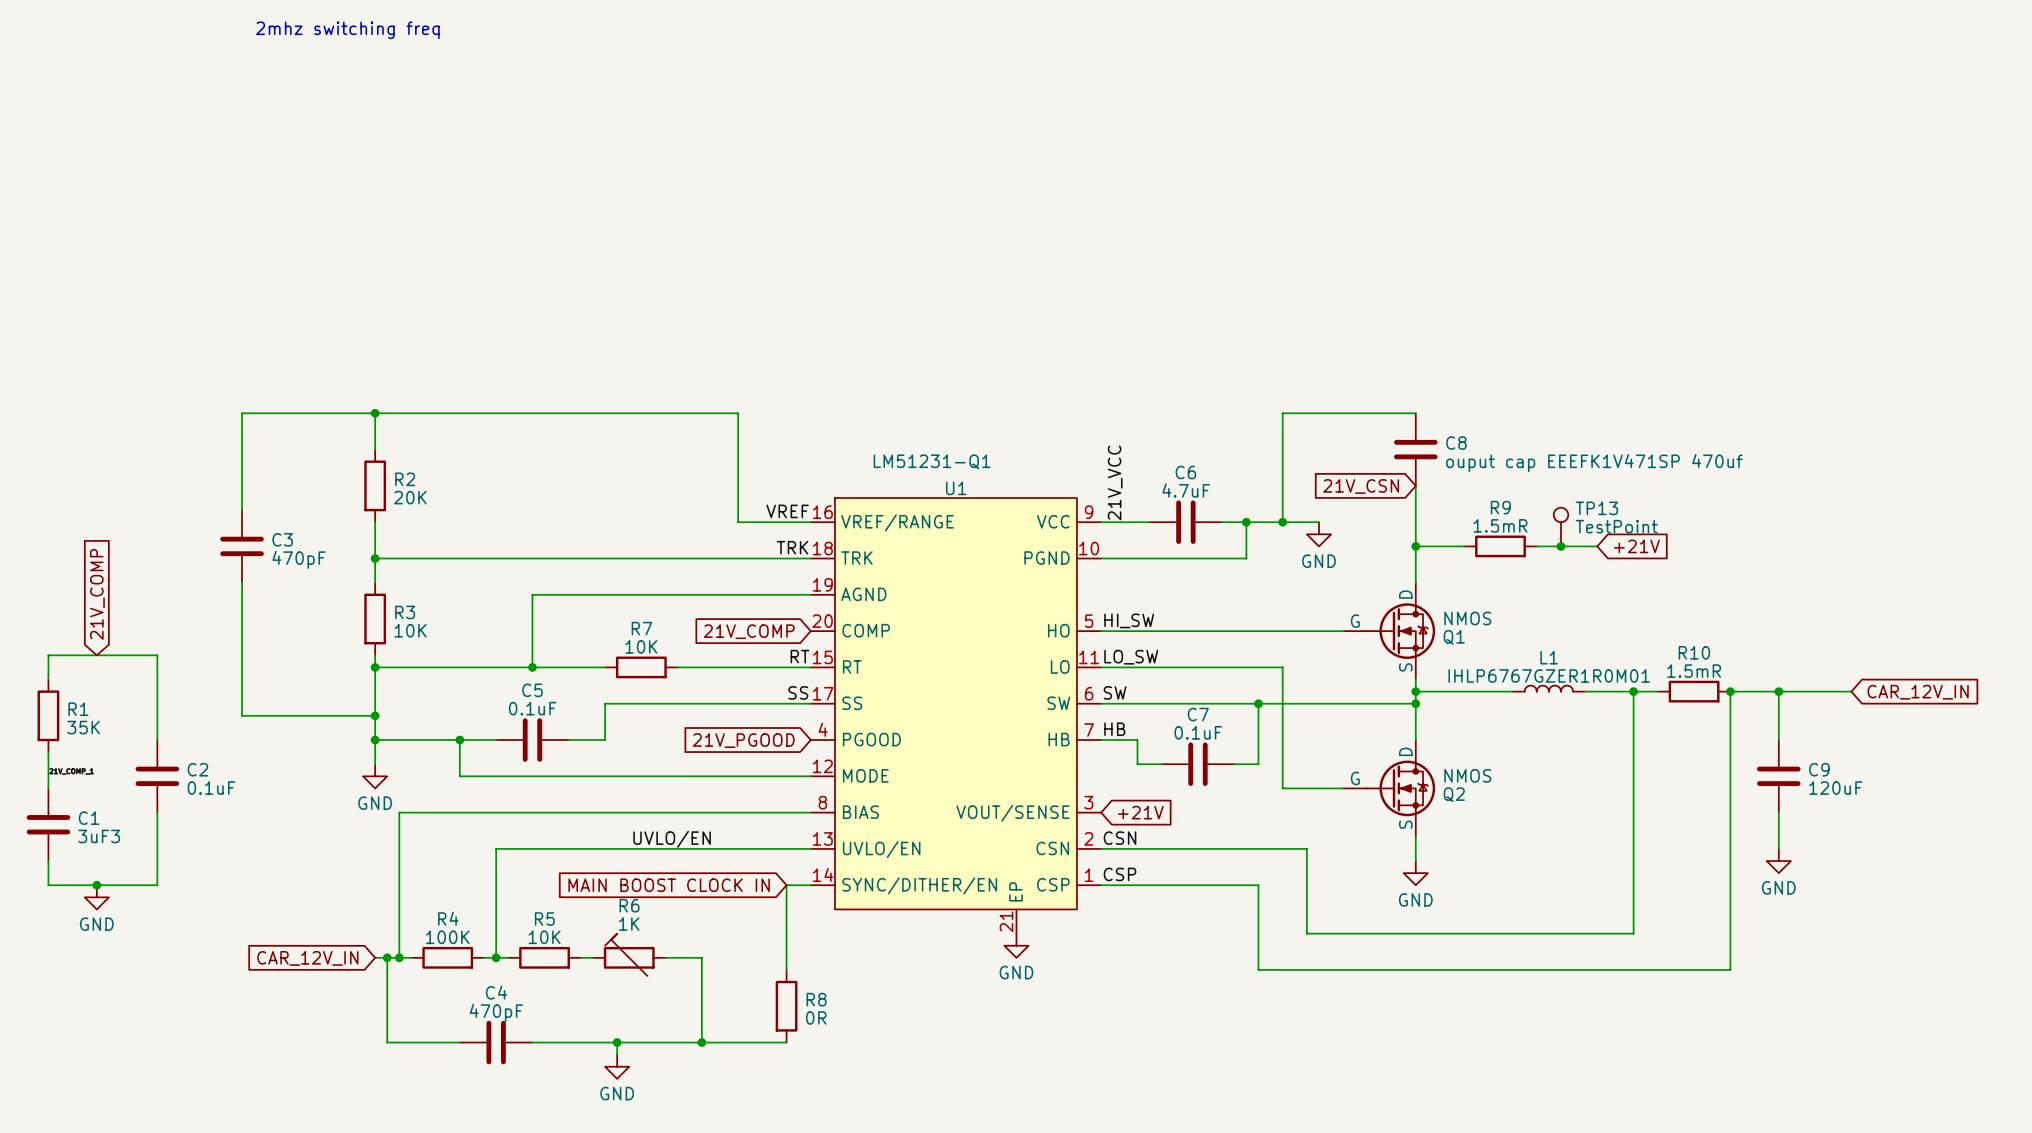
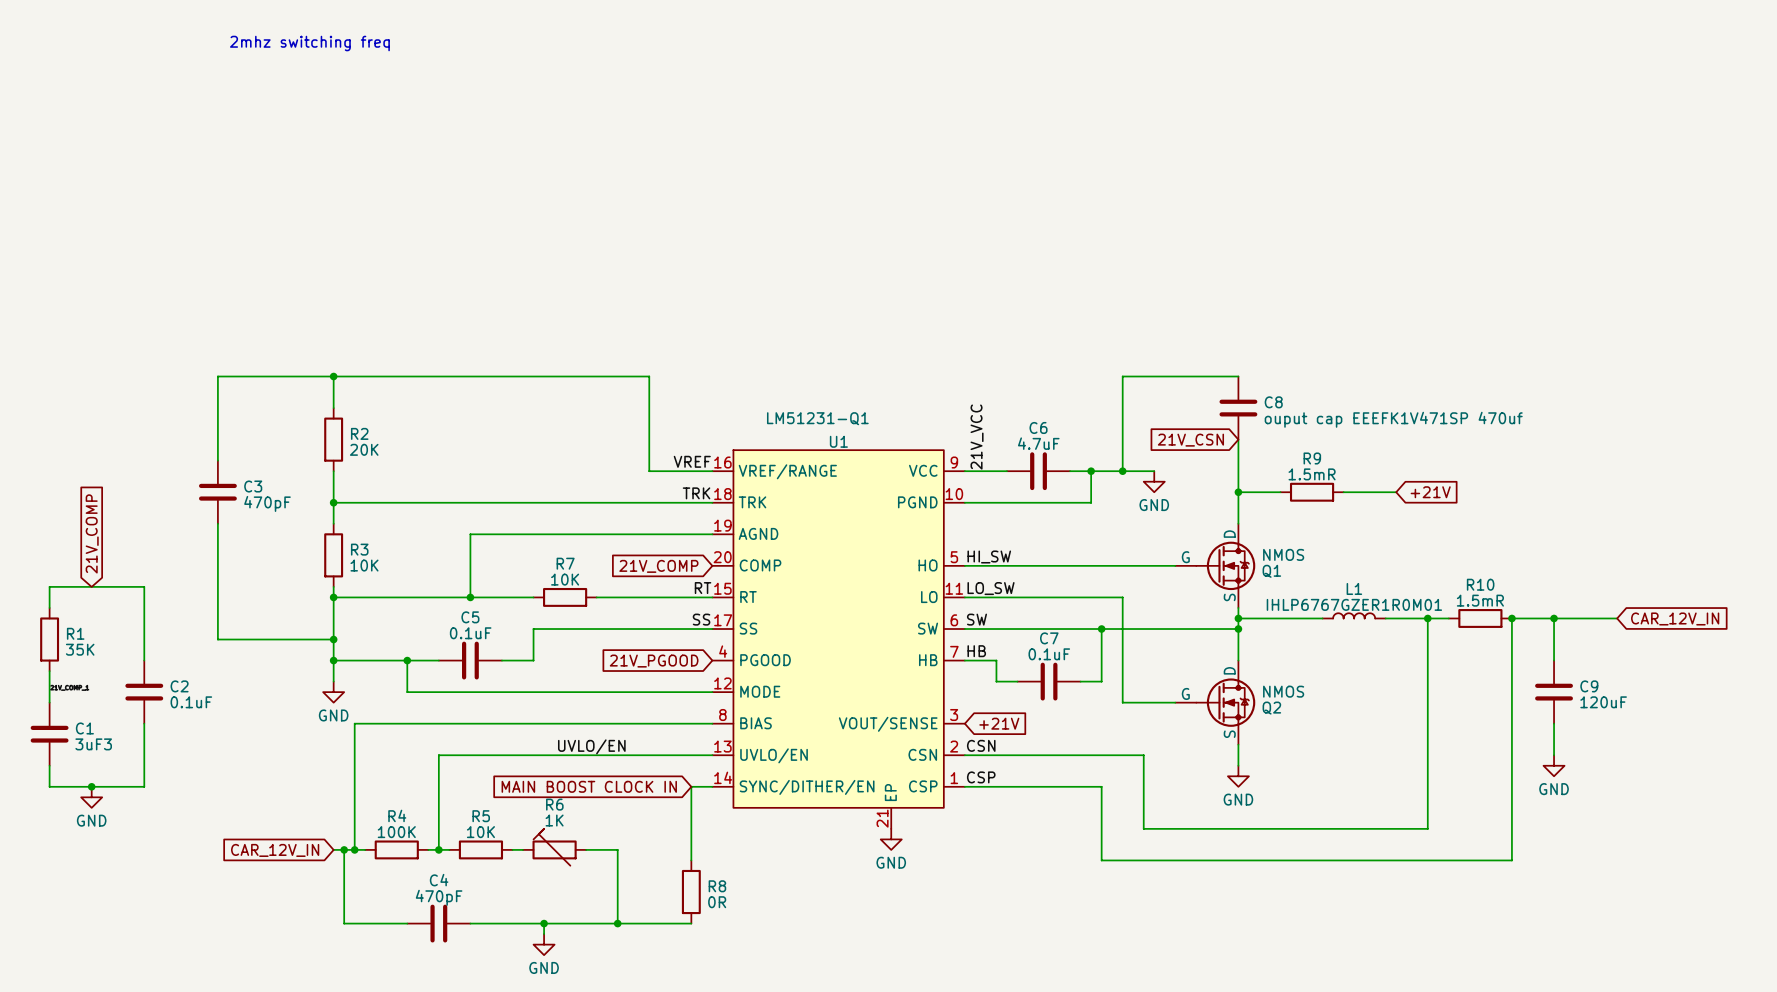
TP13: TestPoint (1561, 527) -> none
junction: (1561, 546) -> none

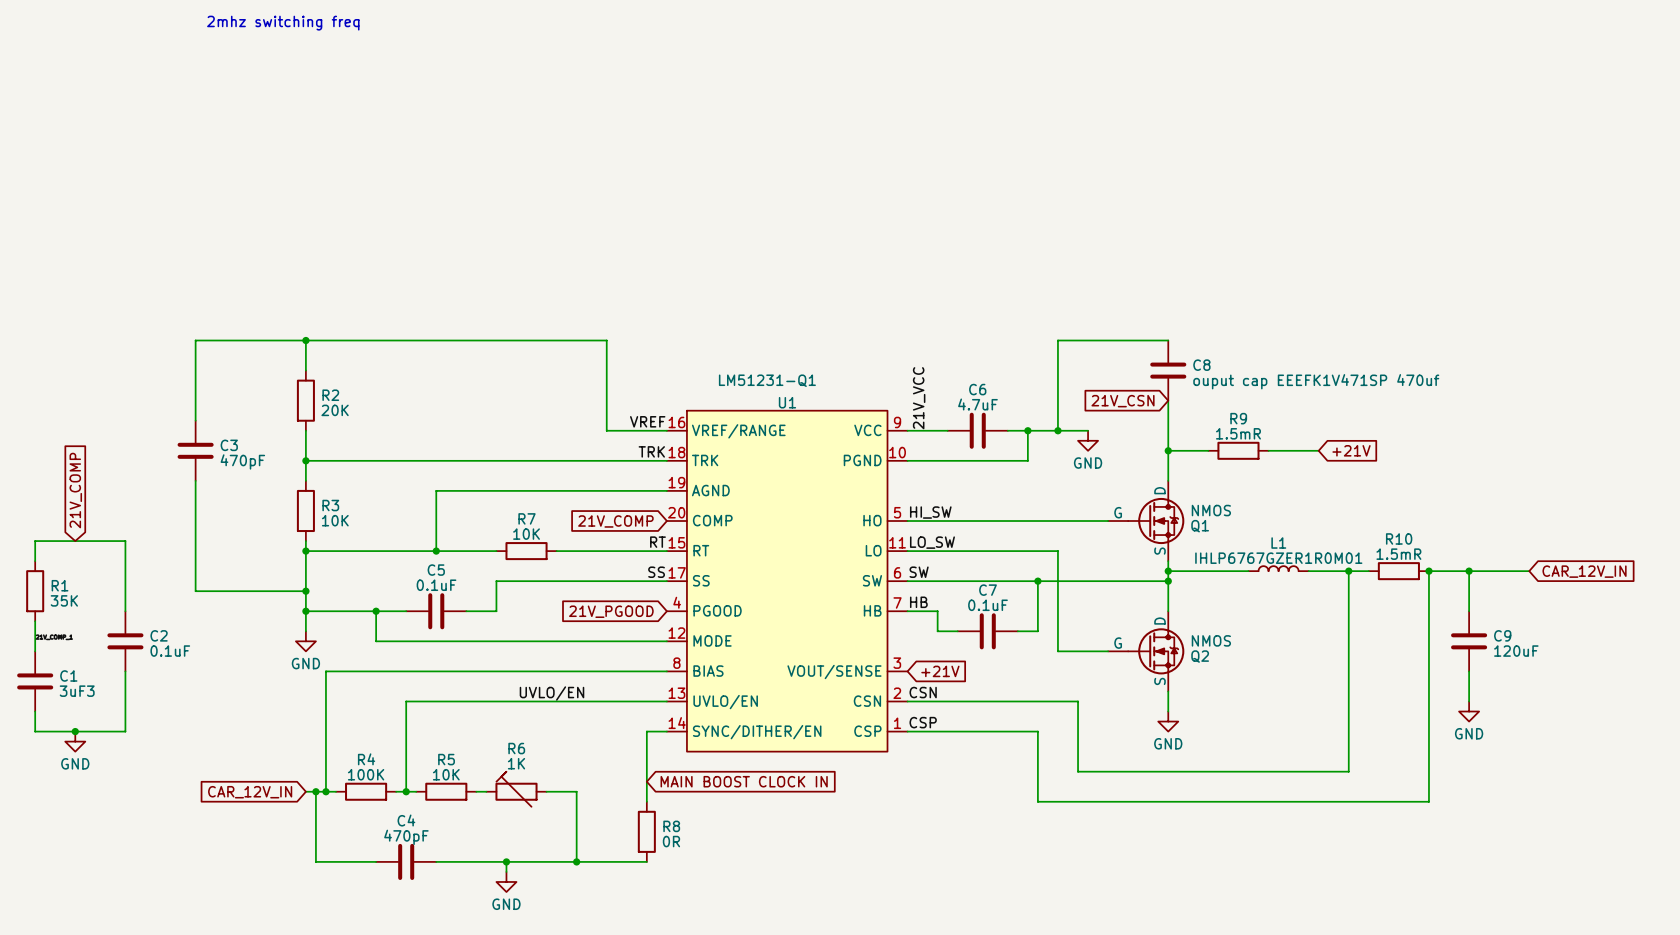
U1 symbol: [712, 450, 965, 829] -> [666, 410, 908, 752]
global label rotation: 0° (589, 786) -> 180° (744, 781)
global label position: MAIN BOOST CLOCK IN (589, 786) -> MAIN BOOST CLOCK IN (744, 781)
power symbol: GND (891, 839) -> none

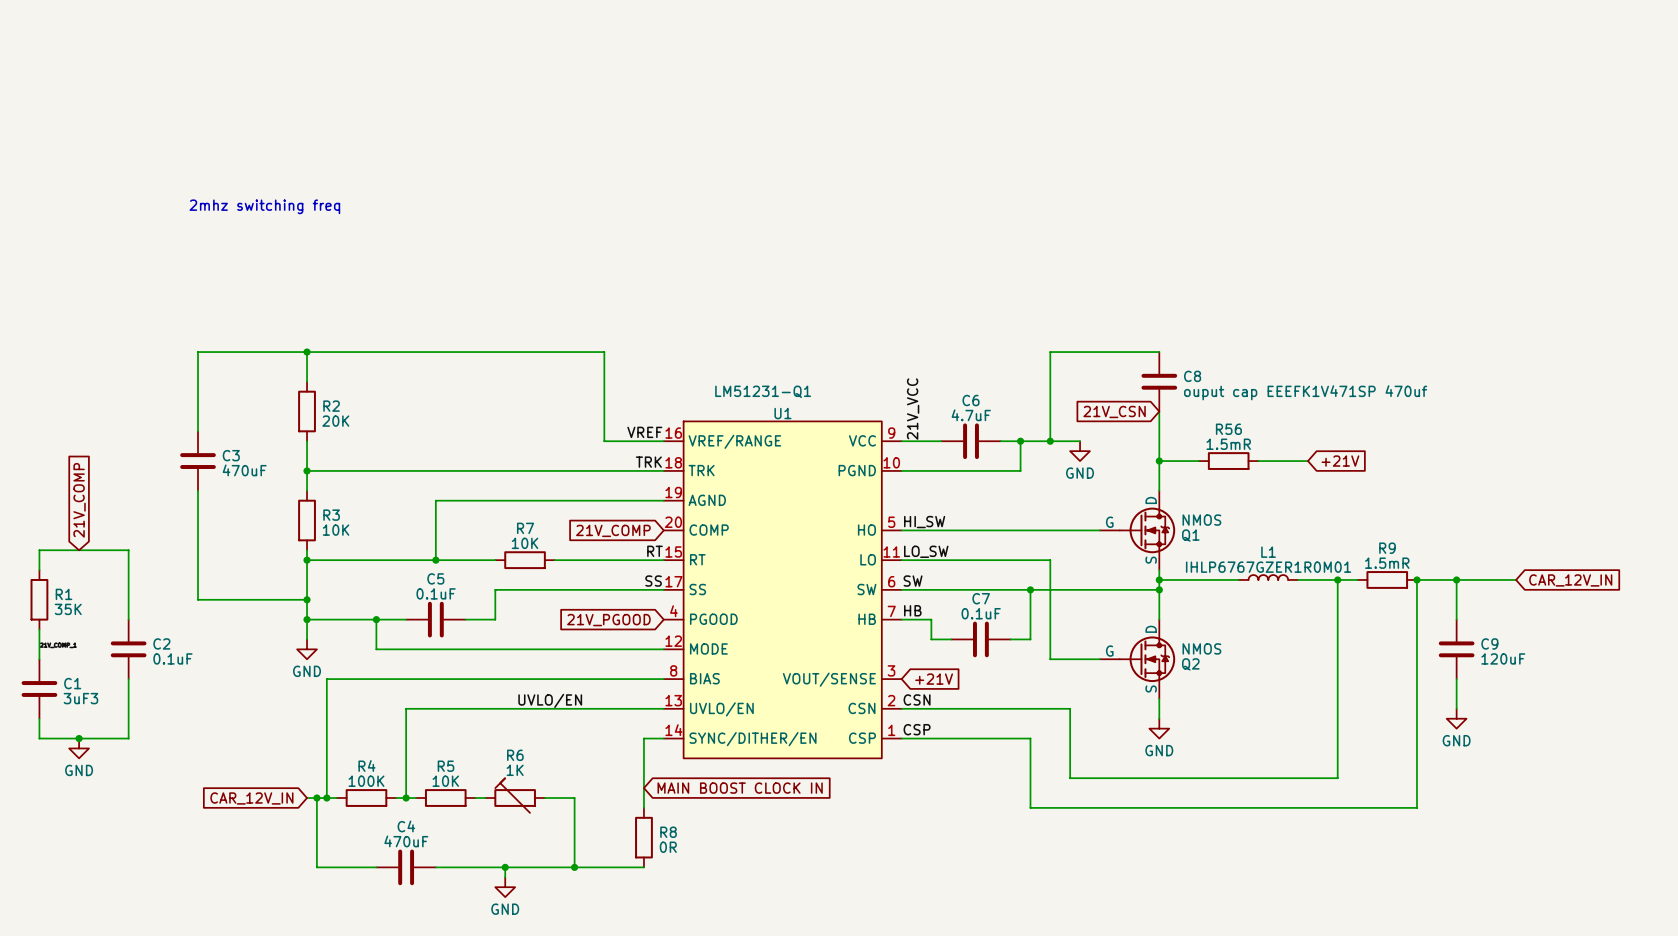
text position: 2mhz switching freq (283, 23) -> 2mhz switching freq (264, 206)
R9 name: R9 (1238, 418) -> R56 (1228, 429)
C3 value: 470pF (242, 461) -> 470uF (244, 470)
R10 name: R10 (1399, 538) -> R9 (1387, 548)
C4 value: 470pF (406, 837) -> 470uF (406, 841)

